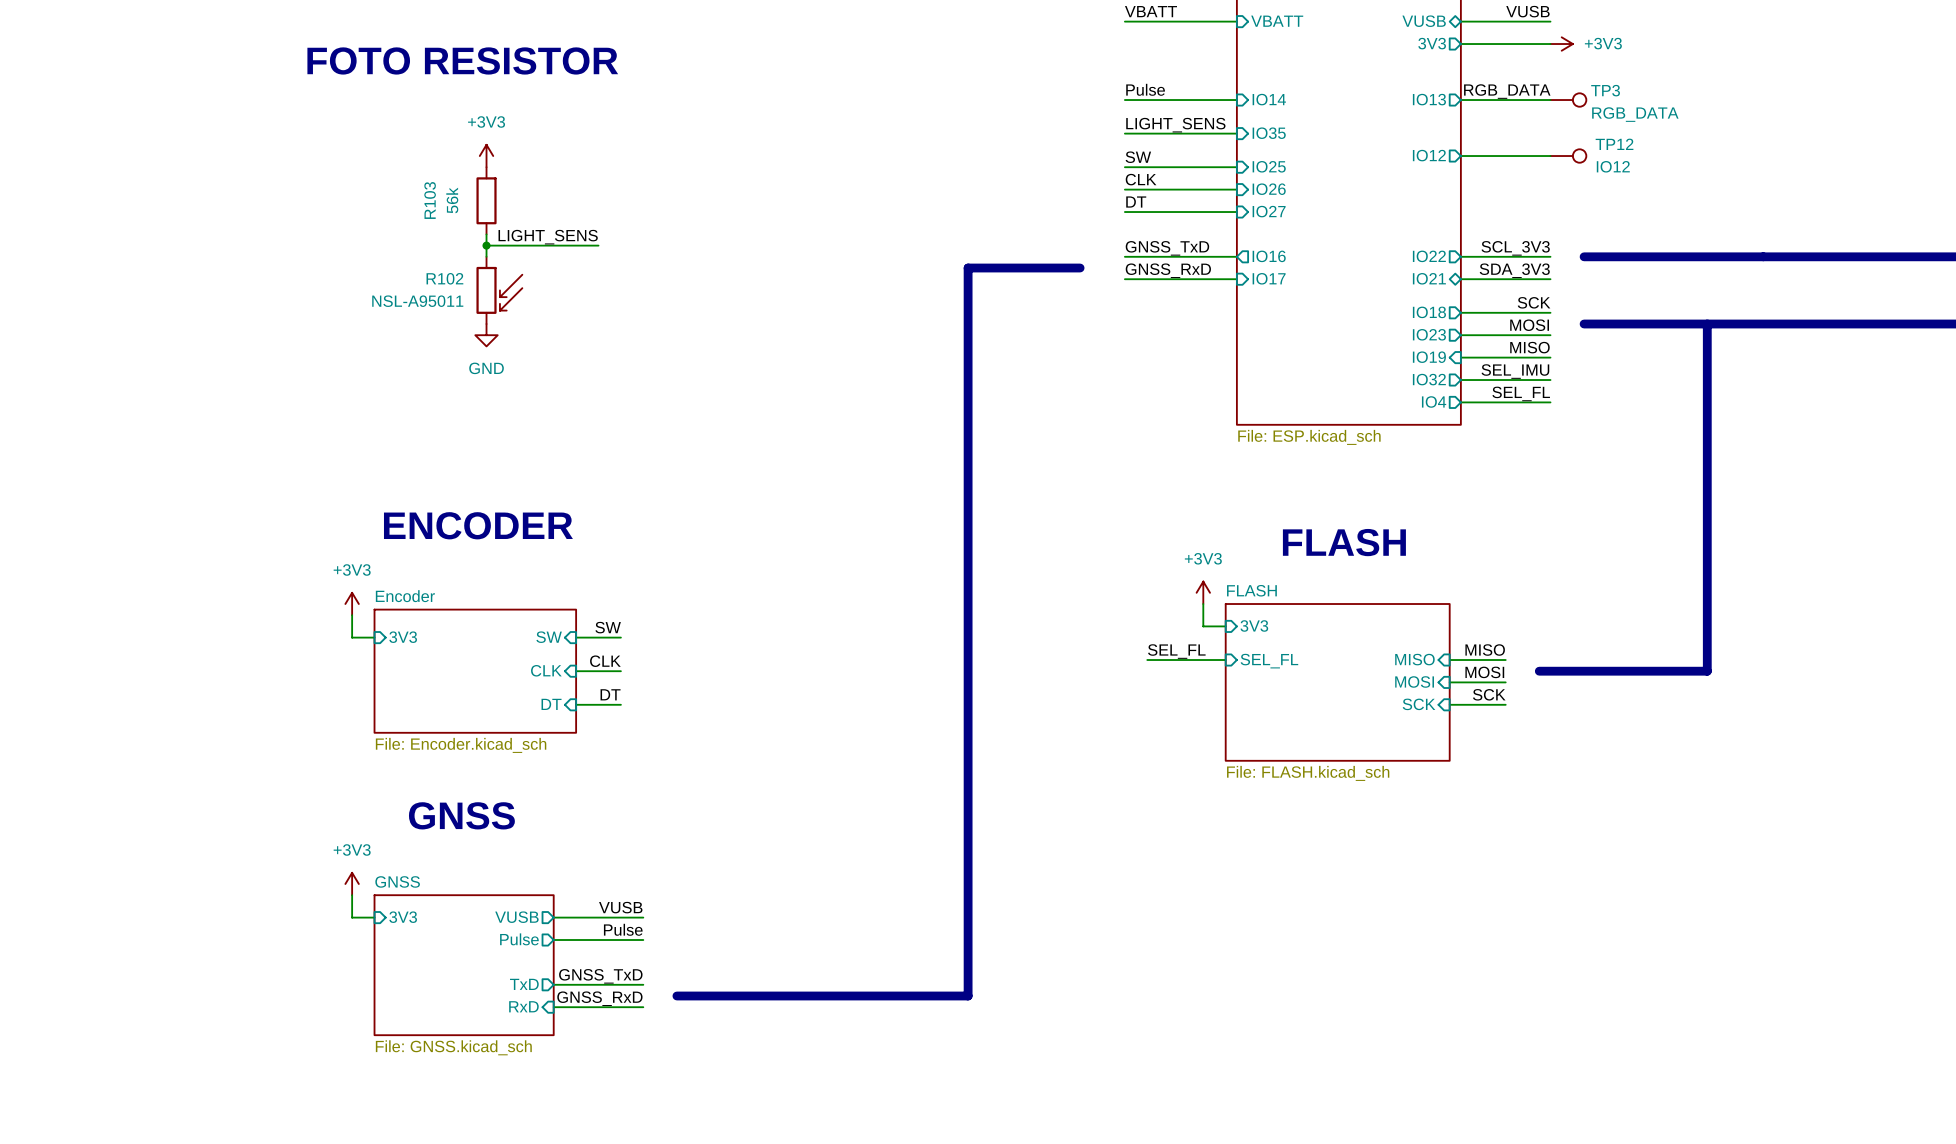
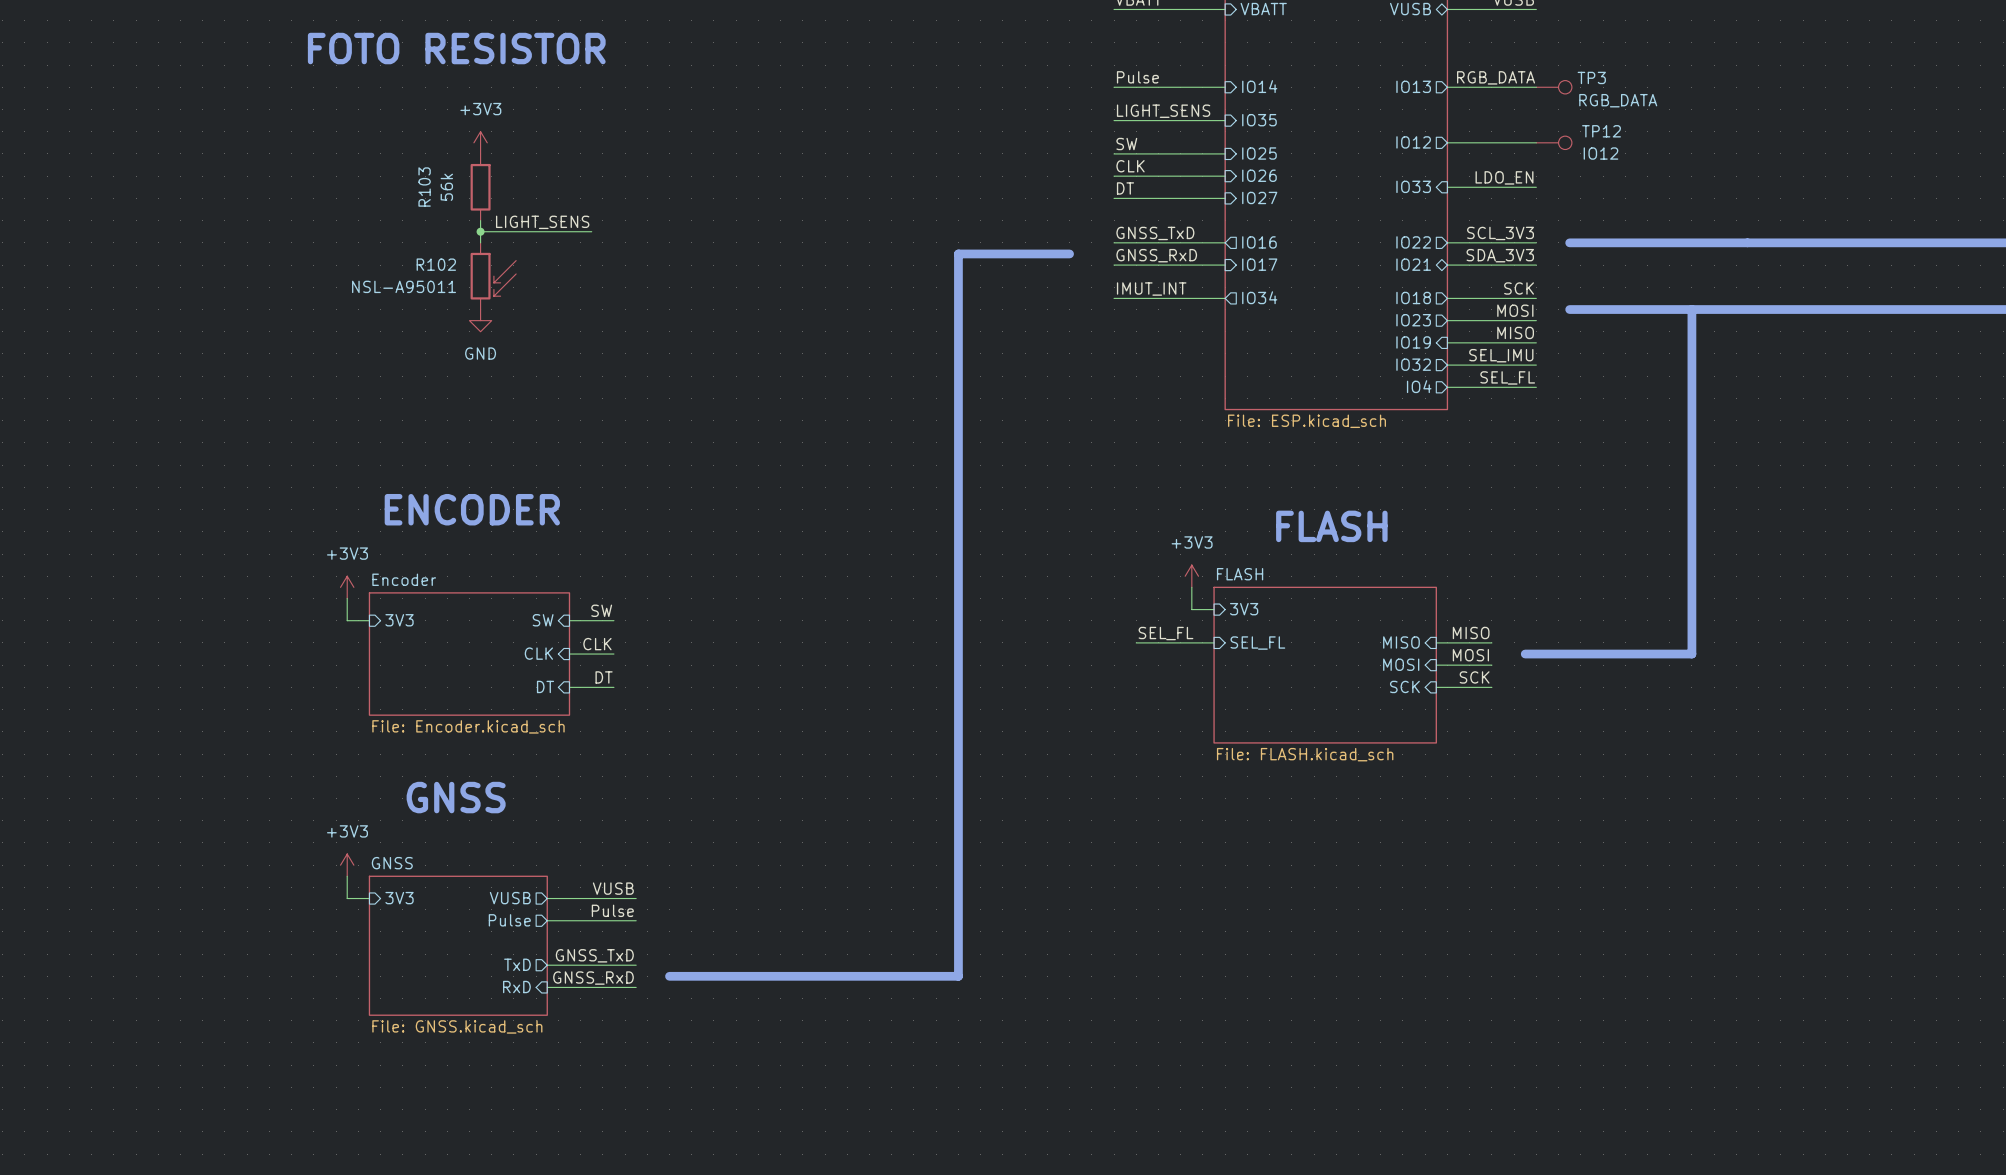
sheet pin: 3V3 (1432, 43) -> none
wire: (1460, 44) (1550, 44) -> (1447, 187) (1536, 187)
power symbol: +3V3 (1561, 44) -> none
label: none -> LDO_EN (1504, 177)
sheet pin: none -> IO33 (1413, 186)
label: none -> IMUT_INT (1151, 289)
wire: none -> (1114, 298) (1225, 298)
sheet pin: none -> IO34 (1259, 297)

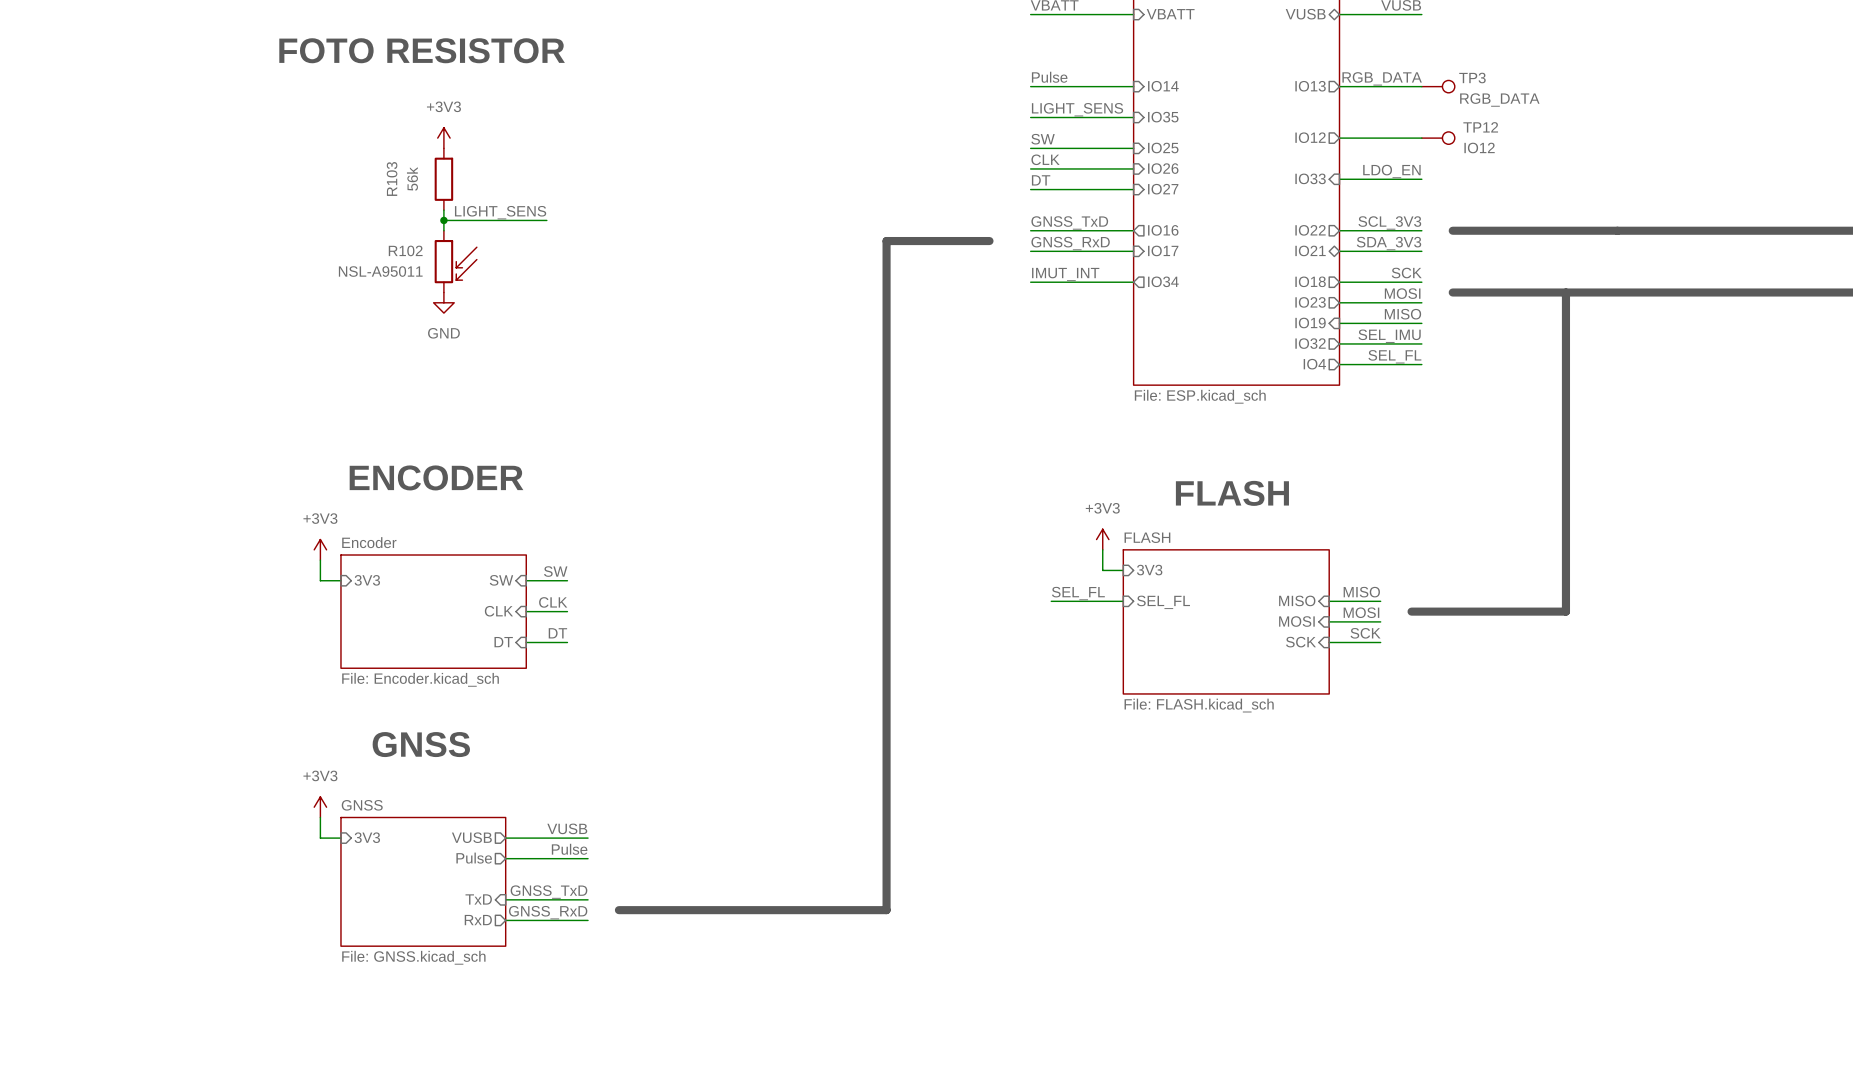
sheet pin shape: output (517, 964) -> input (478, 899)
sheet pin shape: input (516, 987) -> output (478, 920)

